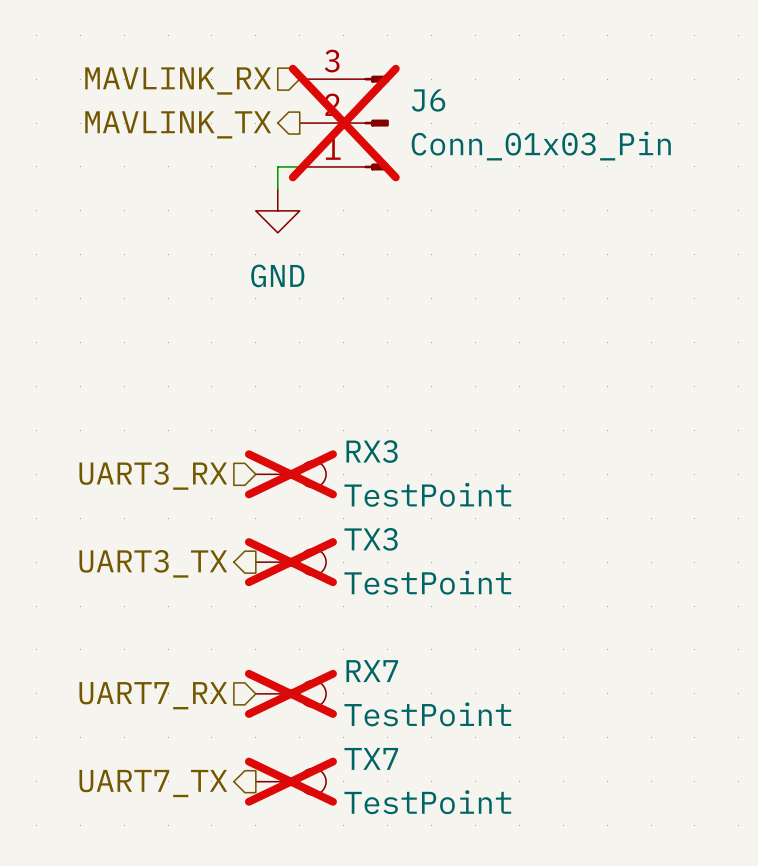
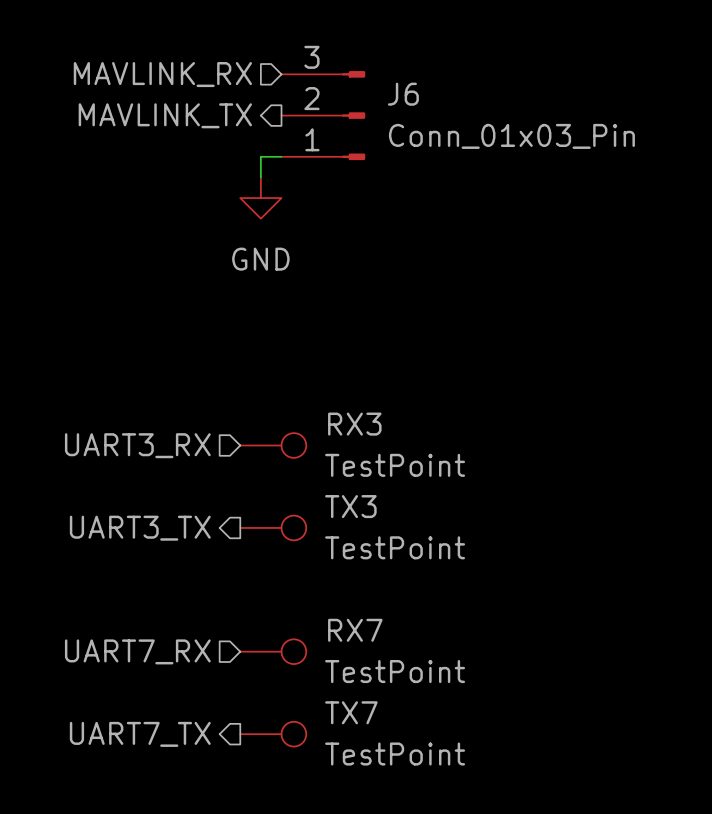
J6 do-not-place cross: (344, 123) -> none
RX3 do-not-place cross: (290, 474) -> none
TX3 do-not-place cross: (290, 562) -> none
RX7 do-not-place cross: (290, 693) -> none
TX7 do-not-place cross: (290, 781) -> none

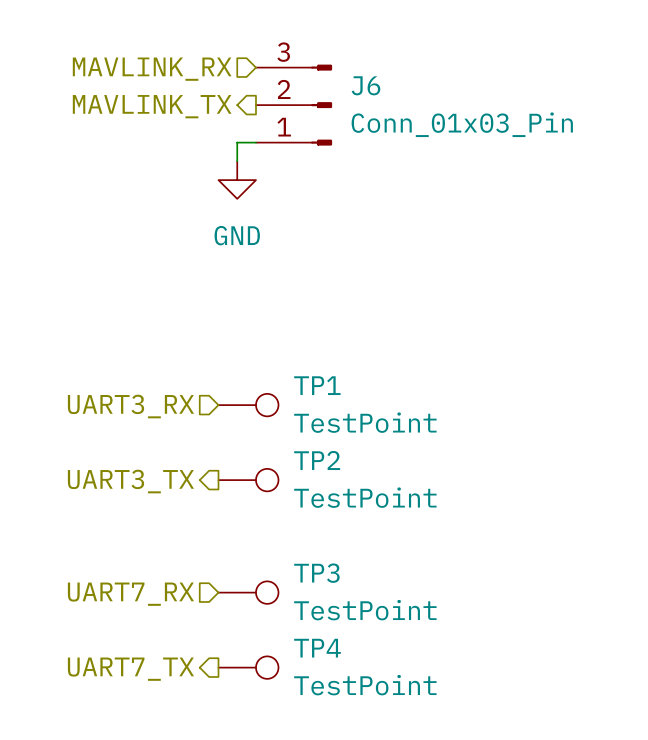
RX3 name: RX3 (354, 424) -> TP1 (317, 385)
TX3 name: TX3 (350, 506) -> TP2 (317, 460)
RX7 name: RX7 (355, 630) -> TP3 (316, 573)
TX7 name: TX7 (351, 712) -> TP4 (317, 648)

